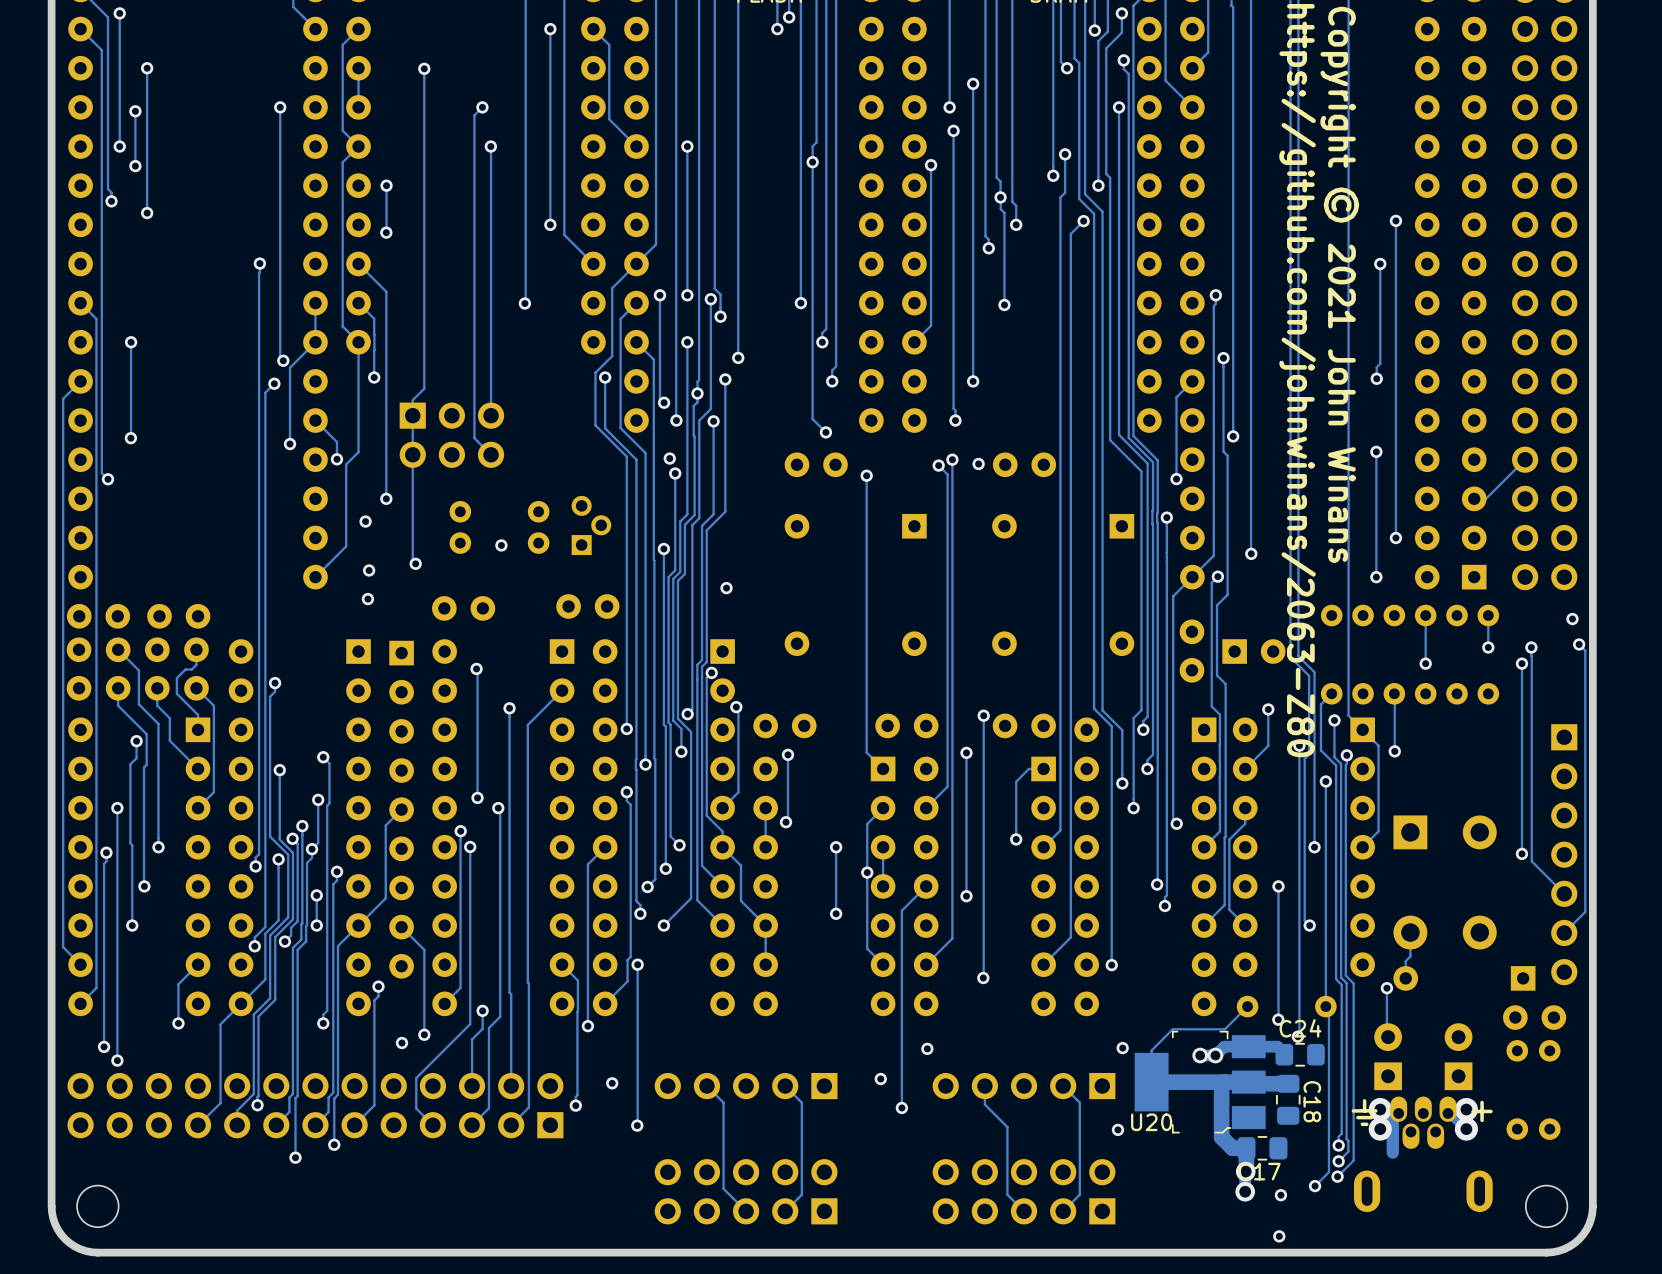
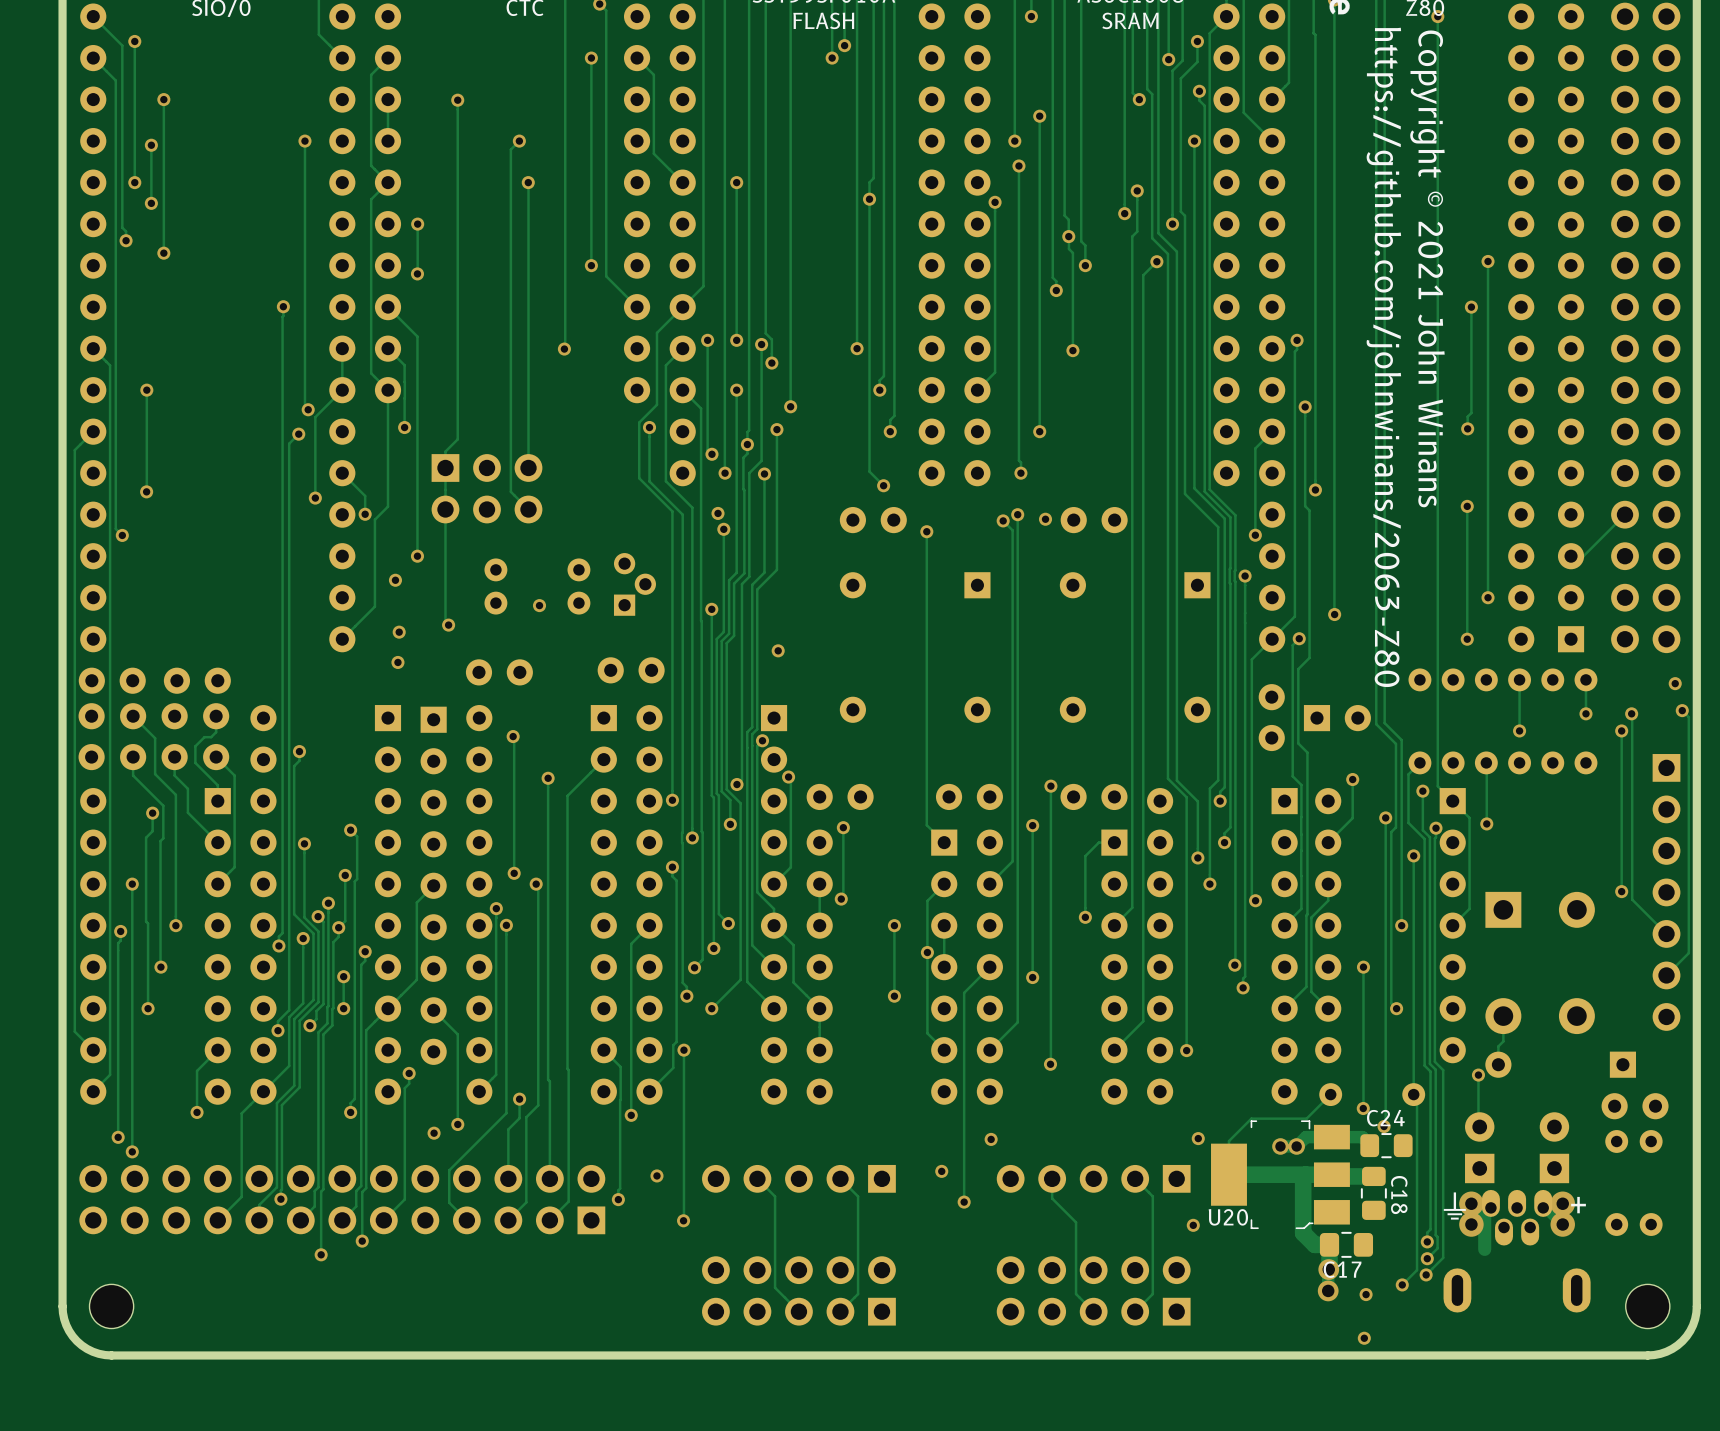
track: (1531, 647) (1531, 861) (1564, 893) -> none
track: none -> (1632, 714) (1632, 899) (1666, 933)
track: (1521, 815) (1521, 853) -> none
via position: (1521, 853) -> (1621, 891)
part position: (1564, 854) -> (1666, 892)
track: (1585, 873) (1585, 911) (1564, 932) -> (1688, 953) (1666, 975)

